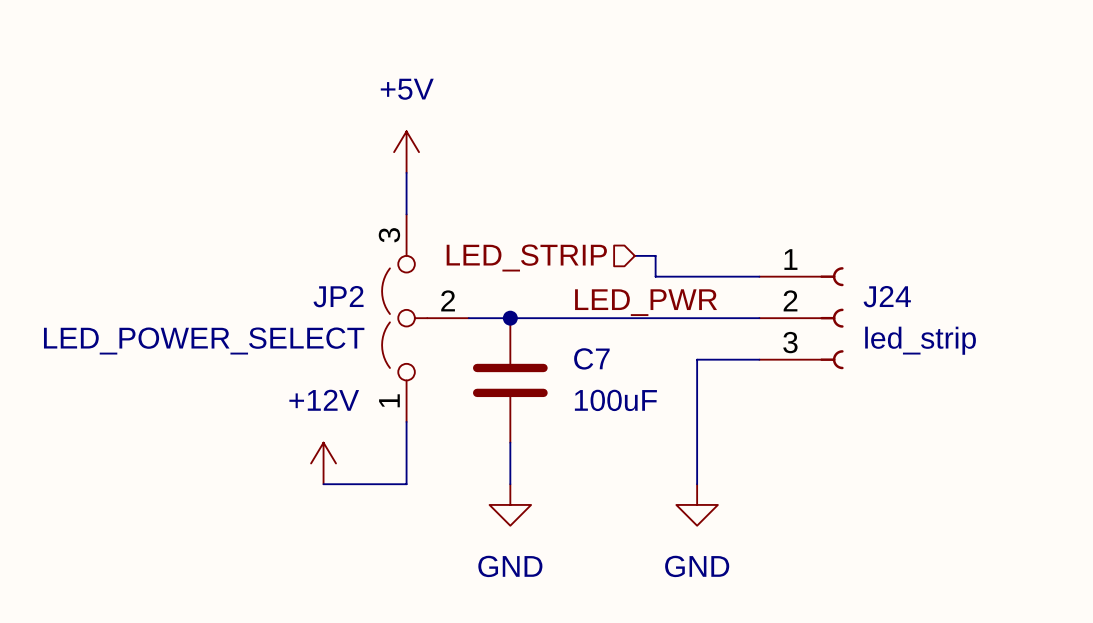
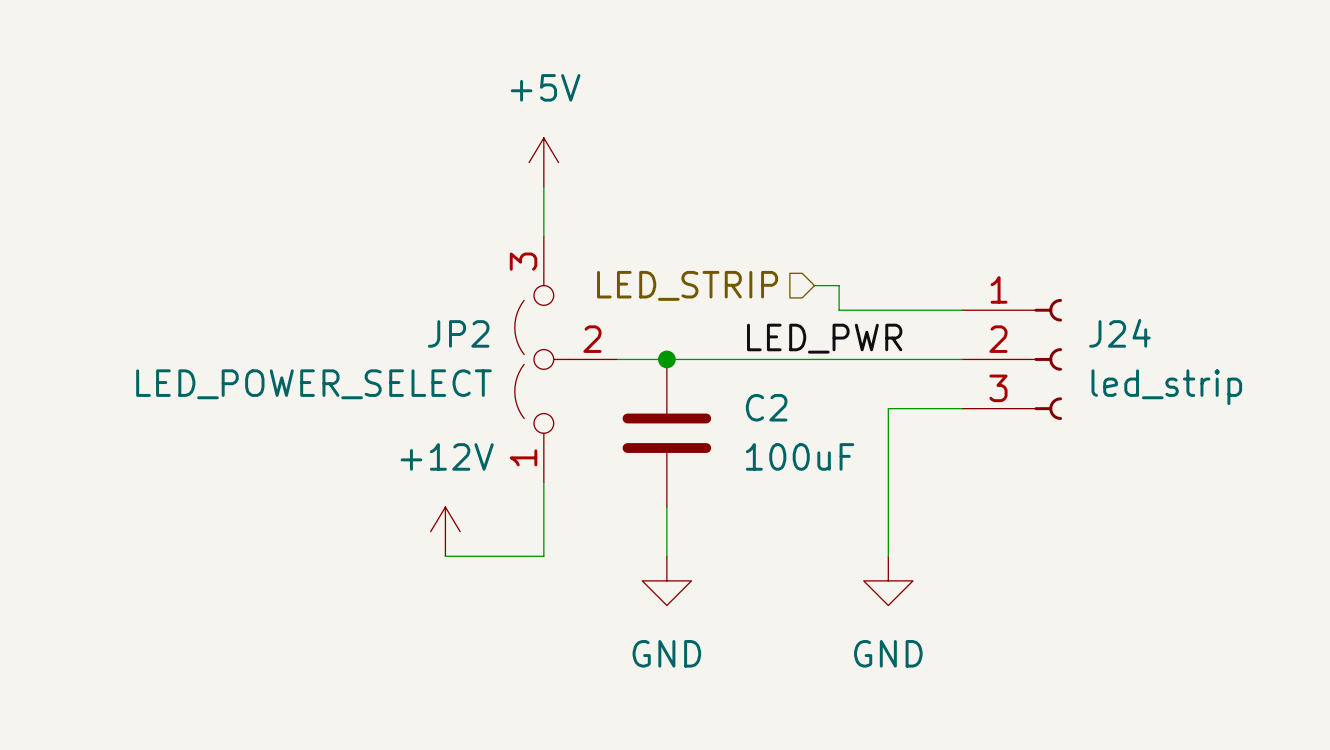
C7 name: C7 (591, 358) -> C2 (766, 407)

